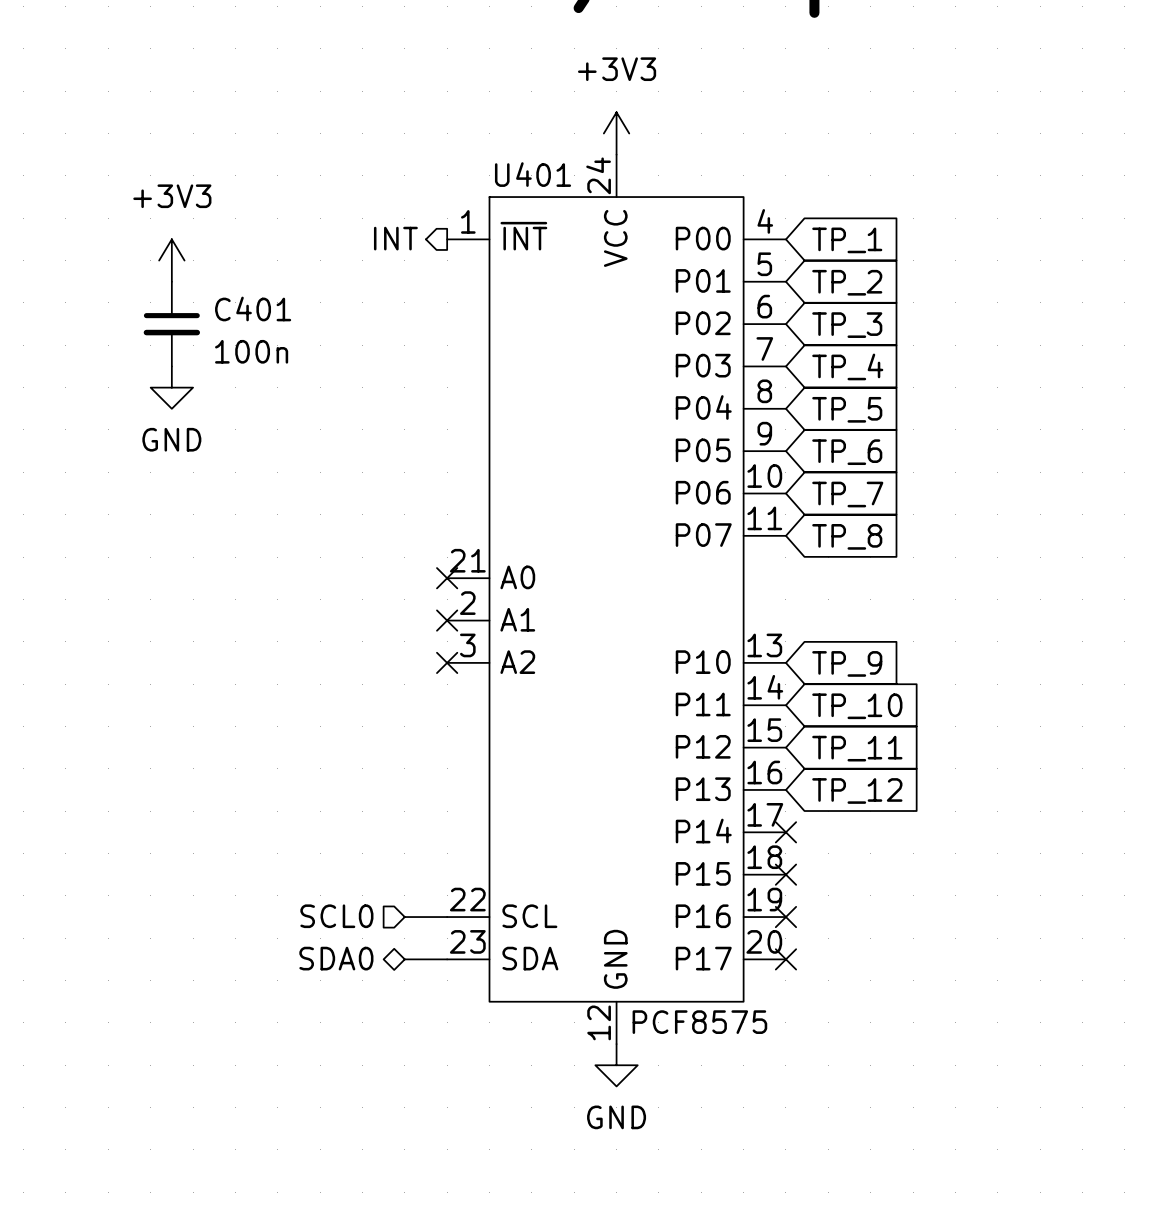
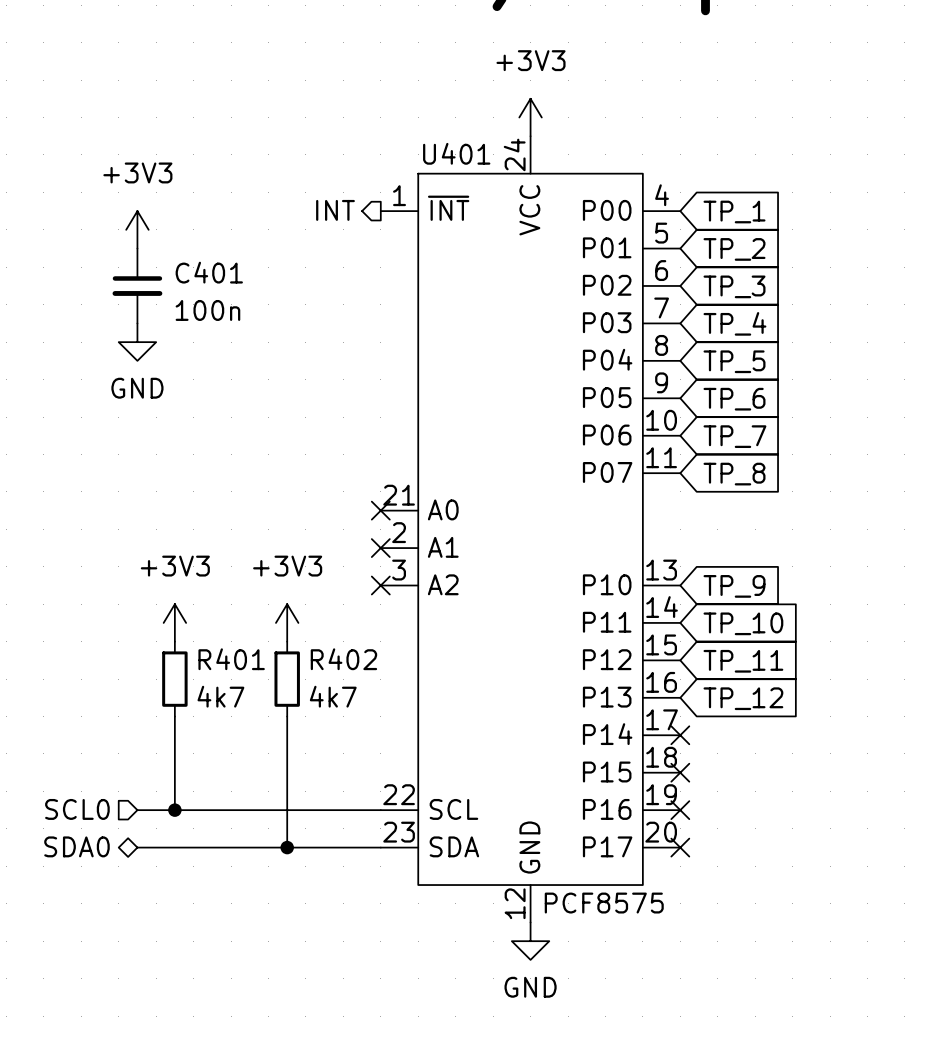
power symbol: none -> +3V3 (174, 622)
power symbol: none -> +3V3 (287, 622)
R401: none -> 4k7 (174, 679)
R402: none -> 4k7 (287, 679)
wire: none -> (174, 716) (174, 810)
wire: none -> (287, 716) (287, 847)
hierarchical label position: SCL0 (336, 916) -> SCL0 (77, 809)
wire: none -> (137, 810) (343, 810)
junction: none -> (174, 810)
hierarchical label position: SDA0 (336, 958) -> SDA0 (76, 846)
wire: none -> (137, 847) (343, 847)
junction: none -> (287, 847)

